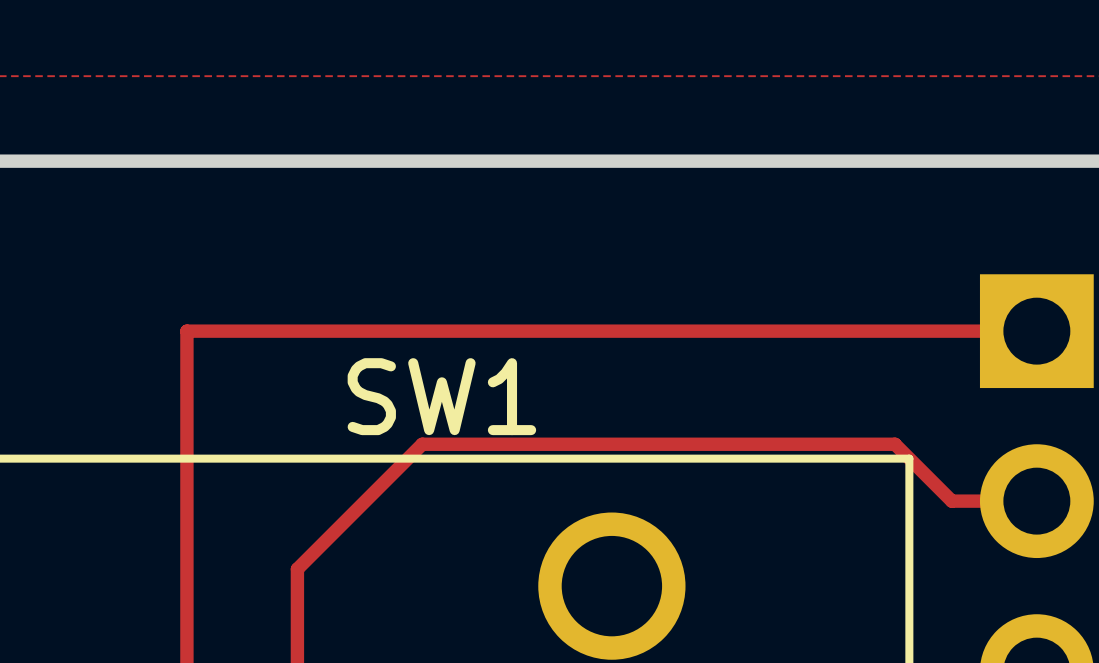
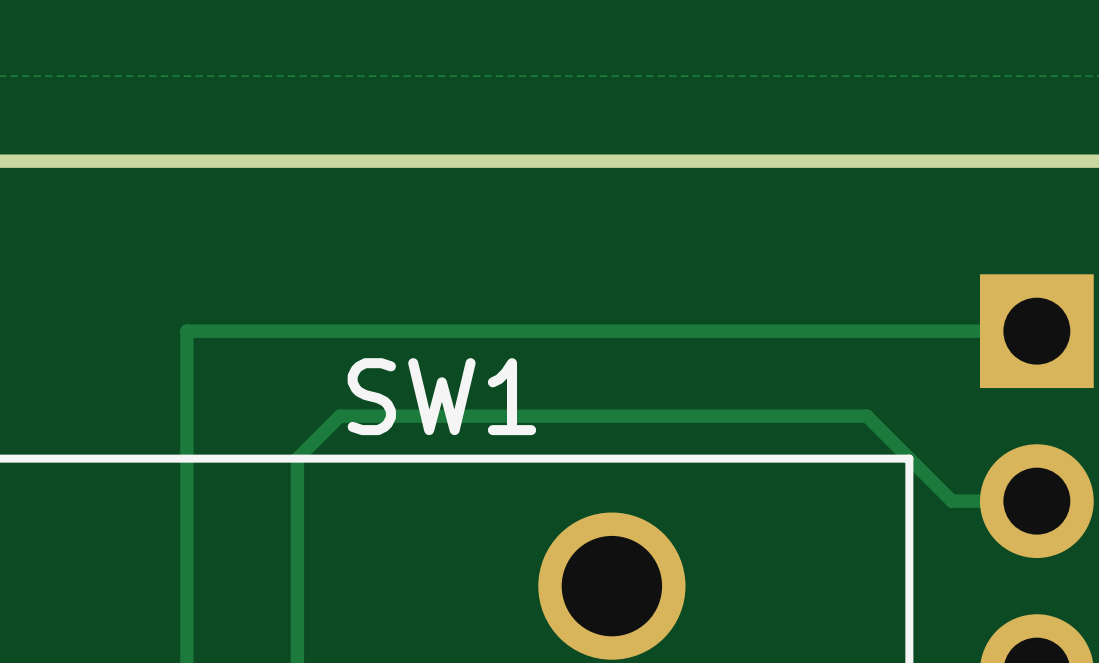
track: (894, 444) (422, 444) (297, 569) -> (894, 444) (866, 416) (339, 416) (297, 458) (297, 569)

